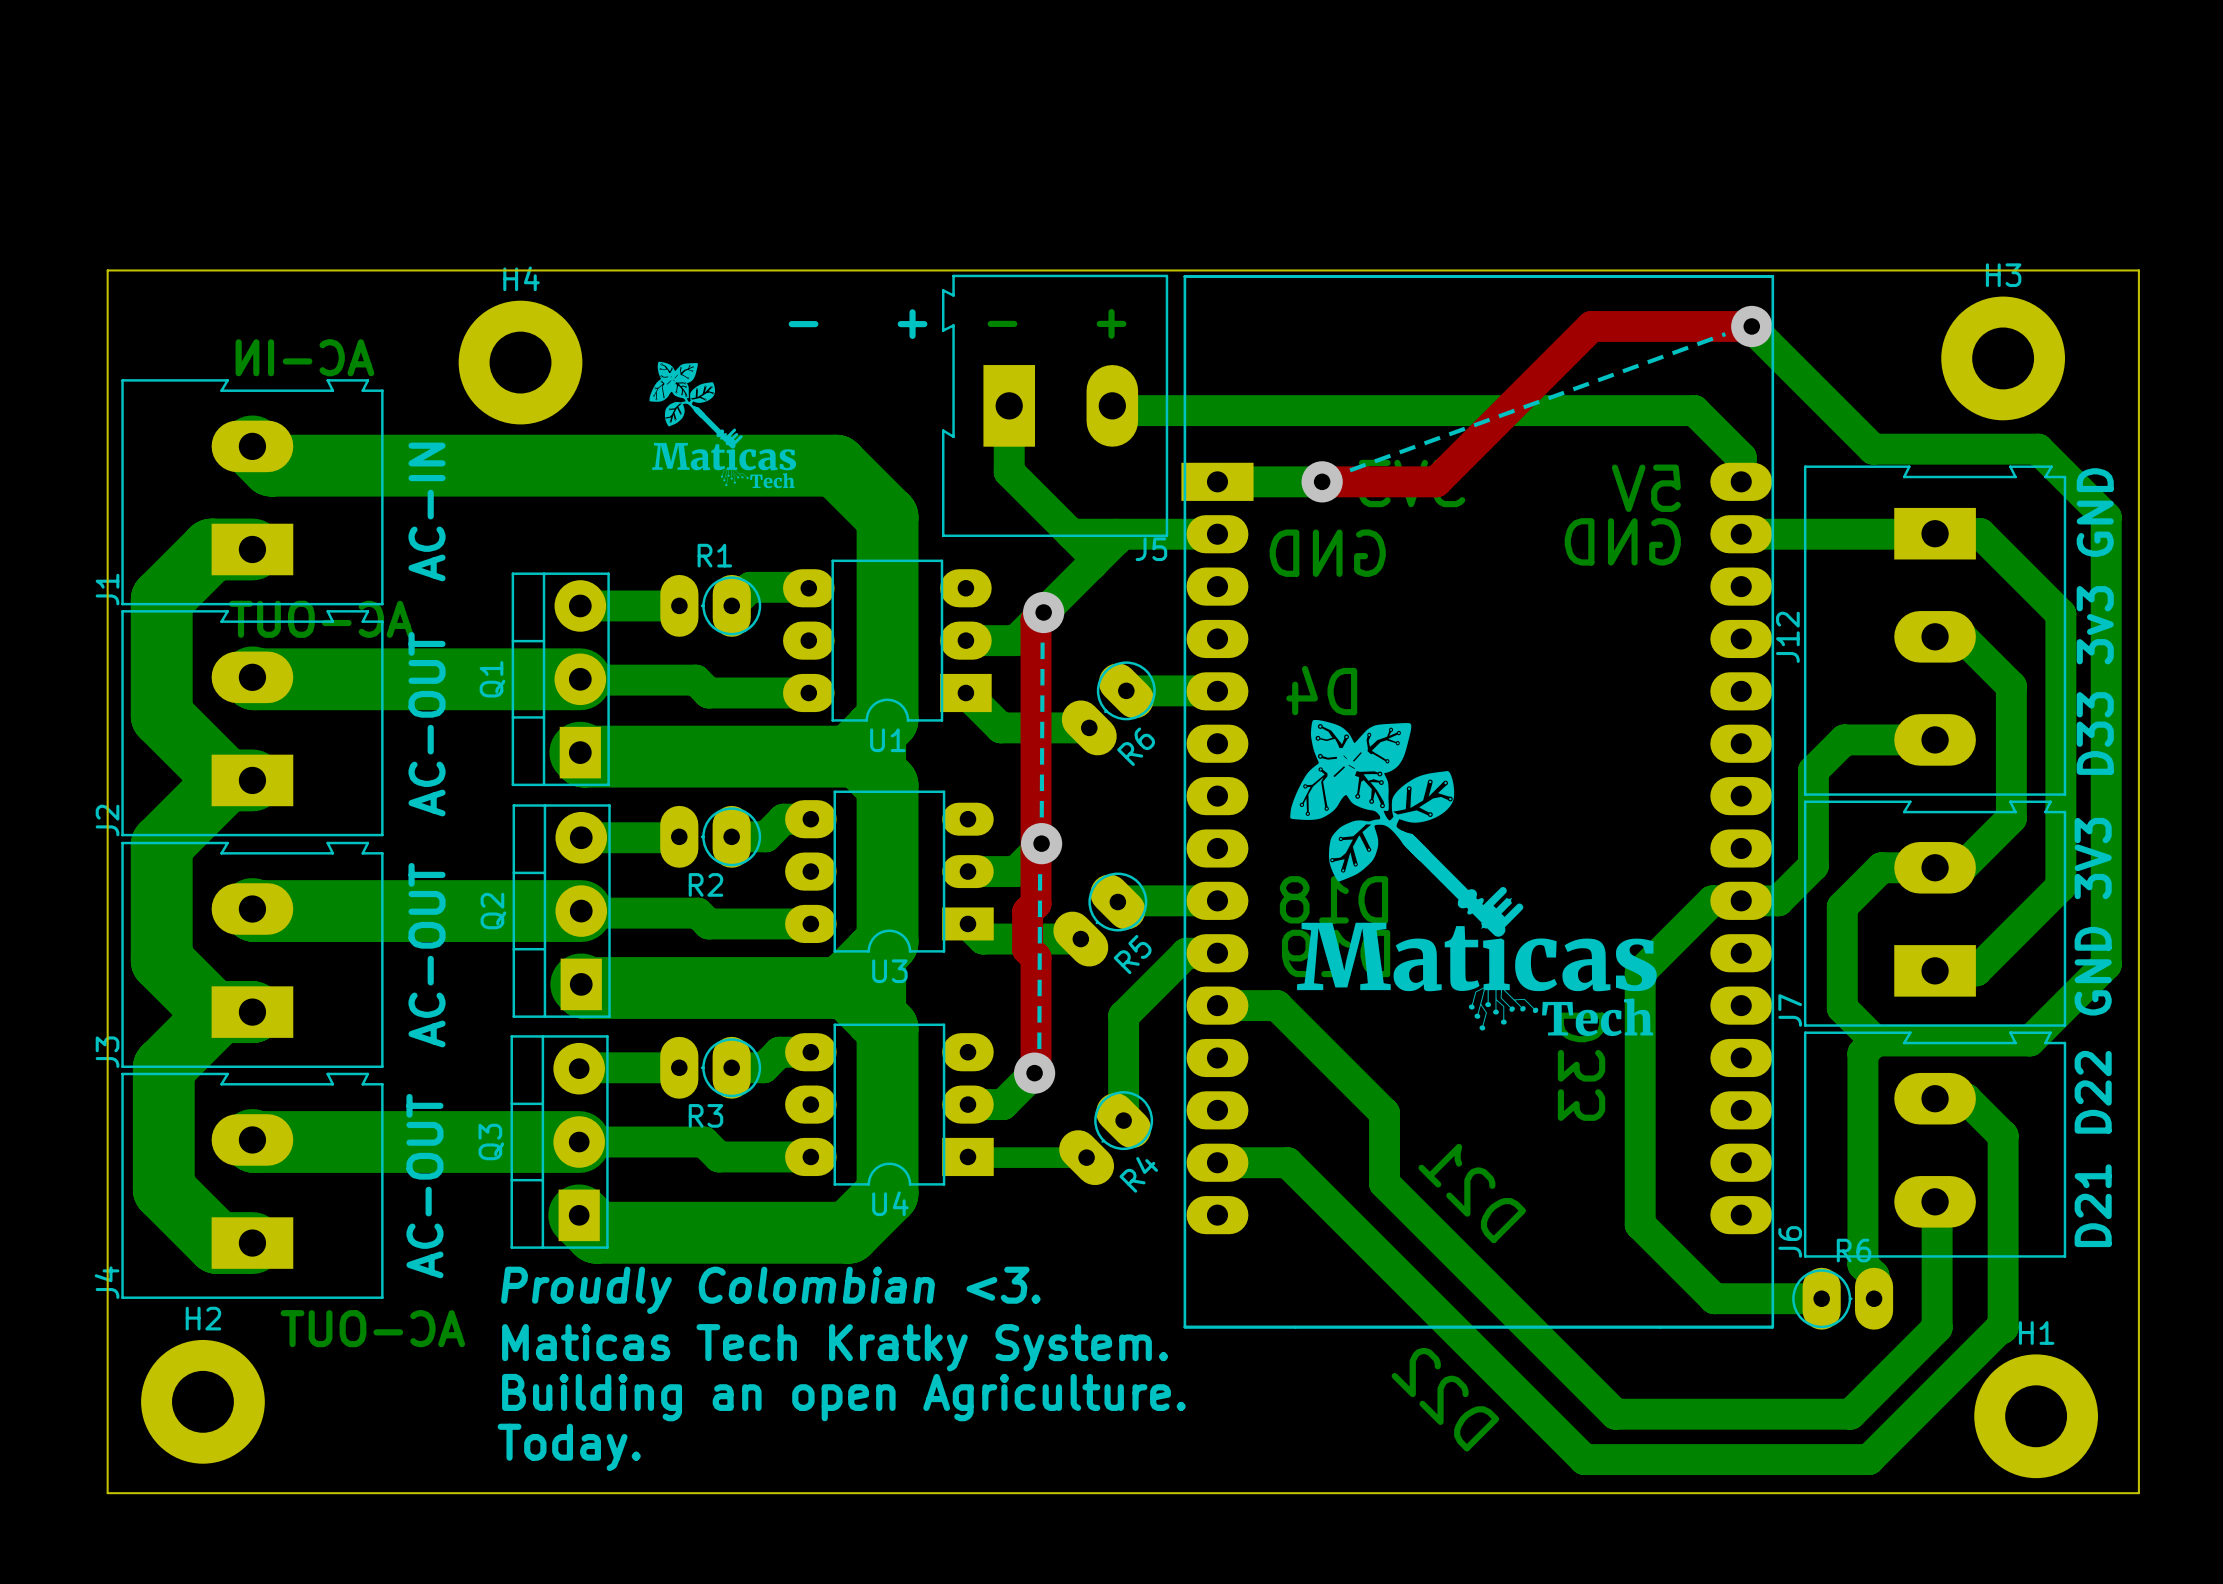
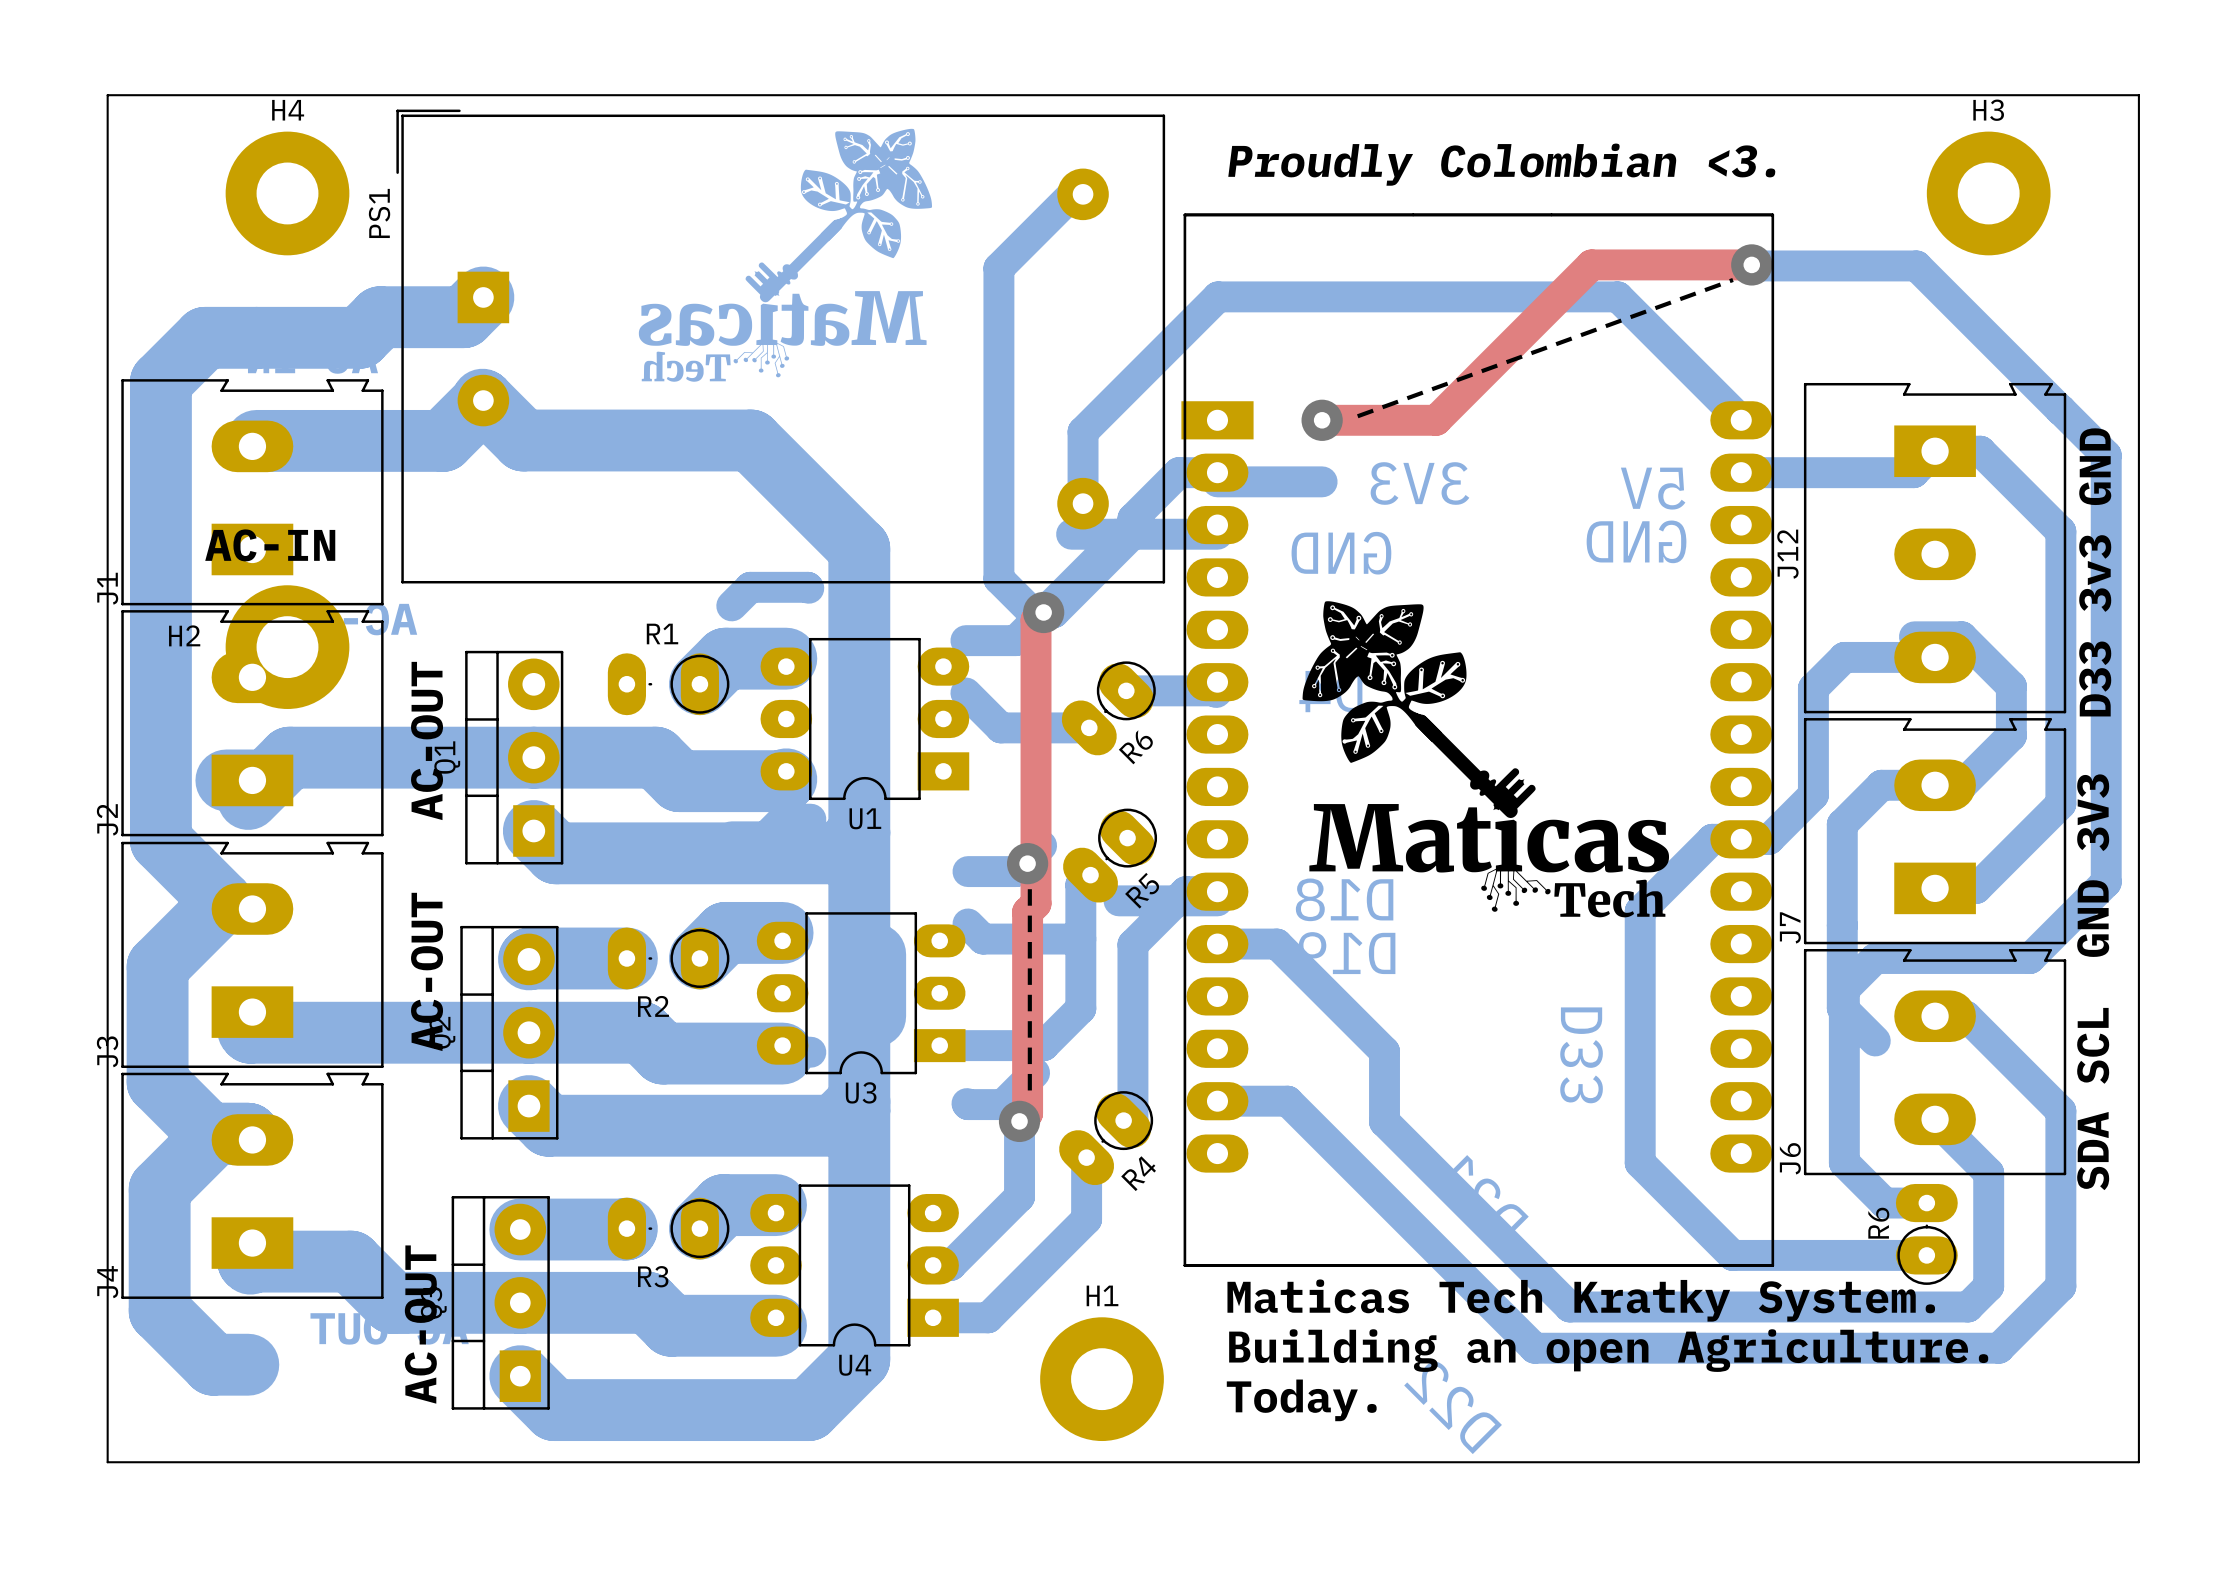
drawing: none -> [638, 128, 933, 382]
text: none -> Proudly Colombian <3. (1501, 164)
bottom track: none -> (1083, 194) (1072, 194) (998, 268) (998, 578) (1032, 612) (1053, 612) (1132, 533) (1132, 518) (1178, 472) (1217, 472)
bottom track: none -> (1749, 264) (1752, 265) (1916, 265) (2060, 409)
board edge: (107, 270) (2138, 270) -> (107, 270) (107, 95) (2138, 95) (2138, 270)
bottom track: none -> (483, 297) (463, 317) (380, 317) (359, 337) (205, 337) (160, 381) (160, 840) (222, 902) (157, 966) (157, 1082) (209, 1133) (248, 1133)
text: - + (1057, 323) -> none
text: - + (858, 324) -> none
bottom track: (1749, 325) (1873, 449) (2038, 449) (2106, 517) -> (2060, 409) (2106, 455) (2106, 517)
top track: (1751, 326) (1591, 326) (1436, 481) (1322, 481) -> (1751, 264) (1591, 264) (1436, 420) (1322, 420)
via position: (1751, 326) -> (1751, 264)
line: (1725, 334) (1350, 470) -> (1733, 279) (1357, 416)
PS1: none -> (780, 346)
H3 position: (2003, 358) -> (1988, 193)
drawing: [649, 361, 797, 489] -> none
H4 position: (520, 362) -> (287, 193)
bottom track: none -> (482, 399) (523, 440) (751, 440) (859, 548) (859, 1359) (808, 1410) (554, 1410) (520, 1376)
bottom track: none -> (483, 400) (443, 440) (256, 440)
bottom track: (1016, 405) (1009, 413) (1009, 471) (1091, 554) (1091, 564) -> none
J5: (1055, 405) -> none
bottom track: (1119, 405) (1112, 405) (1117, 410) (1694, 410) (1741, 457) (1741, 481) -> none
bottom track: none -> (1741, 420) (1617, 296) (1218, 296) (1083, 431) (1083, 503)
bottom track: (252, 446) (271, 465) (836, 465) (887, 517) (887, 719) (850, 756) (584, 756) (580, 752) -> none
bottom track: none -> (1935, 451) (1913, 472) (1741, 472)
via position: (1322, 481) -> (1322, 420)
text rotation: 0° (427, 511) -> 90° clockwise (270, 545)
bottom track: (1741, 534) (1980, 533) (2060, 614) -> (1913, 451) (1980, 451) (2060, 531) (2060, 614)
bottom track: (252, 549) (211, 549) (161, 599) (161, 715) (226, 780) (161, 845) (161, 960) (213, 1012) (252, 1012) -> none
R1 footprint: [660, 574, 762, 637] -> [607, 653, 730, 716]
bottom track: (580, 605) (679, 605) -> none
drawing: none -> [1313, 606, 1341, 697]
drawing: none -> [1357, 610, 1413, 689]
text position: D33 3v3 GND (2095, 621) -> D33 3v3 GND (2095, 572)
J12 position: (1935, 630) -> (1935, 548)
line: (1042, 639) (1041, 817) -> none
U1 position: (887, 640) -> (864, 718)
bottom track: none -> (786, 658) (725, 658) (699, 684)
drawing: none -> [1420, 662, 1464, 698]
bottom track: (252, 677) (254, 679) (695, 680) (708, 693) (808, 693) -> none
Q1 position: (560, 679) -> (514, 757)
drawing: none -> [1352, 719, 1355, 722]
drawing: [1300, 725, 1328, 815] -> none
drawing: [1356, 728, 1400, 807] -> none
drawing: none -> [1354, 729, 1383, 753]
bottom track: (2011, 735) (2011, 818) (1961, 867) (1881, 867) (1842, 906) -> (2011, 735) (1961, 785) (1881, 785) (1842, 824) (1842, 906)
bottom track: (1914, 739) (1844, 739) (1813, 770) -> (1914, 657) (1844, 657) (1813, 688) (1813, 770)
bottom track: (854, 752) (887, 785) (887, 942) (841, 987) (584, 987) (581, 984) -> none
bottom track: none -> (786, 779) (784, 781) (679, 781) (655, 757) (289, 757) (248, 798)
drawing: [1407, 780, 1452, 816] -> none
bottom track: (1813, 795) (1813, 865) (1778, 900) (1712, 900) (1640, 972) -> (1813, 795) (1769, 839) (1712, 839) (1640, 911) (1640, 972)
drawing position: (1372, 800) -> (1384, 682)
part position: (1477, 801) -> (1477, 740)
bottom track: (2060, 803) (2060, 886) (1976, 970) (1914, 970) -> (2060, 803) (1976, 888) (1914, 888)
R2 footprint: [660, 805, 762, 868] -> [607, 927, 730, 990]
bottom track: none -> (533, 830) (556, 853) (838, 853) (859, 832)
bottom track: (679, 836) (581, 837) -> none
drawing: [1331, 837, 1371, 872] -> none
via position: (1041, 843) -> (1027, 863)
line: (1040, 867) (1039, 1049) -> none
U3 position: (889, 871) -> (861, 993)
bottom track: none -> (1090, 875) (1080, 884) (1080, 1008) (1043, 1045) (939, 1045)
bottom track: (2106, 882) (2106, 964) (2029, 1040) (1875, 1040) (1862, 1053) (1862, 1264) (1874, 1275) (1874, 1298) -> (2106, 882) (2029, 958) (1875, 958) (1844, 989) (1844, 1162) (1884, 1203) (1926, 1203)
line: none -> (1029, 884) (1029, 1090)
drawing position: (1463, 884) -> (1475, 765)
bottom track: none -> (1217, 891) (1185, 891) (1132, 944) (1132, 1120)
bottom track: (252, 909) (254, 911) (581, 911) (583, 913) (697, 913) (708, 923) (810, 923) -> none
Q2 position: (561, 911) -> (509, 1032)
J7 position: (1935, 913) -> (1935, 831)
text position: GND 3V3 (2093, 916) -> GND 3V3 (2093, 865)
R5 position: (1100, 919) -> (1110, 855)
bottom track: none -> (782, 932) (725, 932) (699, 958)
top track: (1027, 949) (1036, 957) (1034, 1073) -> (1027, 949) (1027, 1113) (1019, 1121)
bottom track: (1217, 953) (1186, 953) (1123, 1016) (1123, 1120) -> none
drawing position: (1343, 956) -> (1356, 837)
bottom track: none -> (626, 958) (528, 959)
drawing position: (1462, 958) -> (1474, 839)
drawing position: (1417, 964) -> (1429, 846)
drawing position: (1536, 964) -> (1548, 846)
drawing position: (1586, 964) -> (1598, 846)
drawing position: (1636, 964) -> (1648, 846)
bottom track: (843, 984) (887, 1028) (887, 1193) (848, 1232) (596, 1232) (579, 1215) -> none
drawing position: (1503, 984) -> (1515, 865)
bottom track: (1217, 1005) (1276, 1005) (1384, 1113) -> (1217, 944) (1276, 944) (1384, 1051) (1384, 1113)
bottom track: (219, 1012) (163, 1067) (163, 1189) (217, 1243) (252, 1243) -> (215, 1133) (159, 1189) (159, 1311) (213, 1364) (248, 1364)
drawing position: (1638, 1016) -> (1650, 898)
bottom track: none -> (1914, 1016) (1966, 1016) (2060, 1111) (2060, 1286) (1999, 1348) (1534, 1348) (1287, 1101) (1217, 1101)
drawing position: (1557, 1018) -> (1569, 899)
drawing position: (1586, 1022) -> (1599, 904)
drawing position: (1611, 1022) -> (1623, 904)
bottom track: none -> (248, 1030) (250, 1032) (642, 1032) (663, 1053) (782, 1053)
R3 footprint: [660, 1036, 762, 1099] -> [607, 1197, 730, 1260]
bottom track: (679, 1067) (579, 1068) -> none
via position: (1034, 1073) -> (1019, 1121)
text: none -> SDA SCL (2093, 1099)
bottom track: (1914, 1098) (1966, 1098) (2003, 1135) (2003, 1327) (1999, 1328) (1868, 1459) (1584, 1459) (1287, 1162) (1217, 1162) -> none
bottom track: none -> (859, 1100) (834, 1125) (548, 1125) (528, 1106)
U4 position: (889, 1104) -> (854, 1265)
bottom track: none -> (1019, 1121) (1019, 1196) (950, 1265) (932, 1264)
bottom track: (1384, 1121) (1384, 1183) (1615, 1414) (1850, 1414) (1937, 1327) (1937, 1203) (1935, 1201) -> (1384, 1121) (1569, 1306) (1968, 1306) (1988, 1286) (1988, 1172) (1935, 1119)
bottom track: (252, 1139) (254, 1142) (704, 1142) (718, 1156) (810, 1156) -> none
Q3 position: (559, 1142) -> (500, 1302)
J6 position: (1935, 1144) -> (1935, 1062)
text: D21 D22 (2093, 1148) -> none
bottom track: (1086, 1157) (967, 1156) (969, 1158) -> (1086, 1157) (1086, 1219) (988, 1317) (933, 1317)
bottom track: (1640, 1162) (1640, 1224) (1714, 1298) (1821, 1298) -> (1640, 1162) (1732, 1255) (1926, 1255)
text position: AC-OUT (424, 1186) -> AC-OUT (420, 1324)
bottom track: none -> (776, 1205) (723, 1205) (699, 1228)
bottom track: none -> (626, 1228) (520, 1229)
bottom track: none -> (250, 1263) (248, 1261) (351, 1261) (392, 1302) (648, 1302) (671, 1325) (776, 1325)
text: Proudly Colombian <3. (770, 1290) -> none
R6 rotation: 0° (1842, 1298) -> 90° counterclockwise (1926, 1234)
R6 position: (1842, 1298) -> (1926, 1234)
text: none -> Maticas Tech Kratky System. (1581, 1300)
H2 name position: H2 (203, 1318) -> H2 (184, 635)
text: Maticas Tech Kratky System. (835, 1347) -> none
text: none -> Building an open Agriculture. (1608, 1350)
text: Building an open Agriculture. (843, 1397) -> none
H2 position: (202, 1401) -> (287, 647)
text: none -> Today. (1301, 1400)
H1 position: (2036, 1416) -> (1102, 1379)
text: Today. (569, 1447) -> none
board edge: (107, 1462) (107, 1493) (2138, 1493) (2138, 1462) -> (107, 1462) (2138, 1462)

